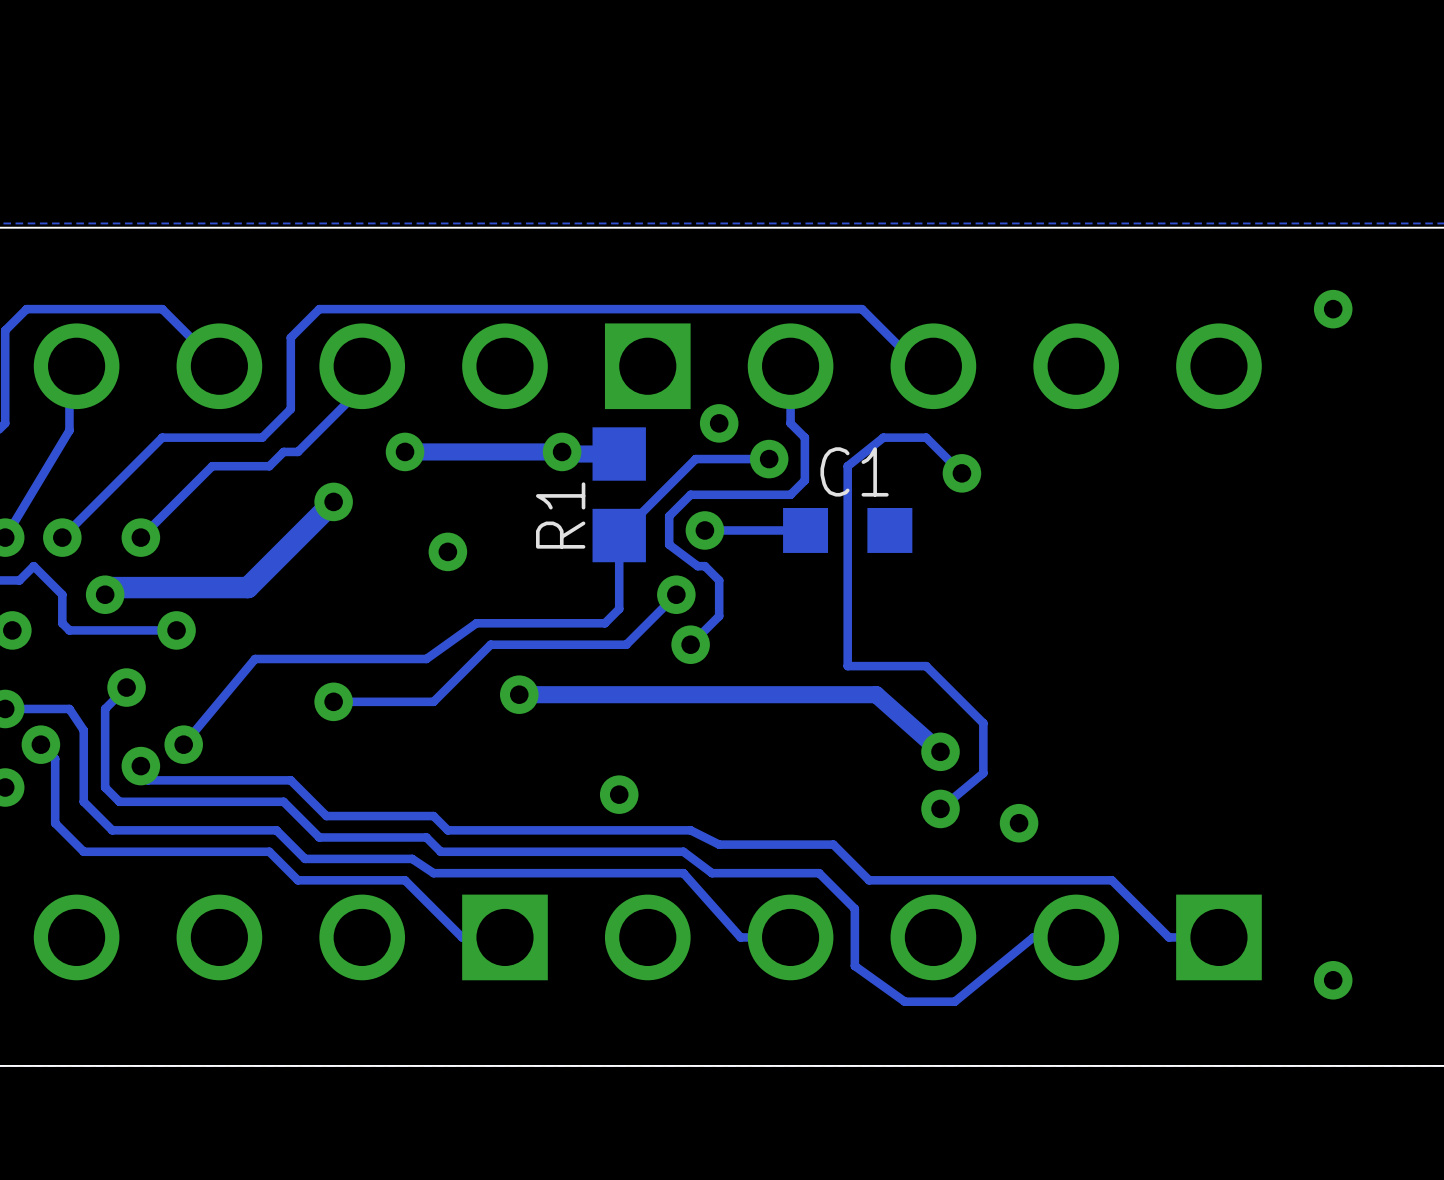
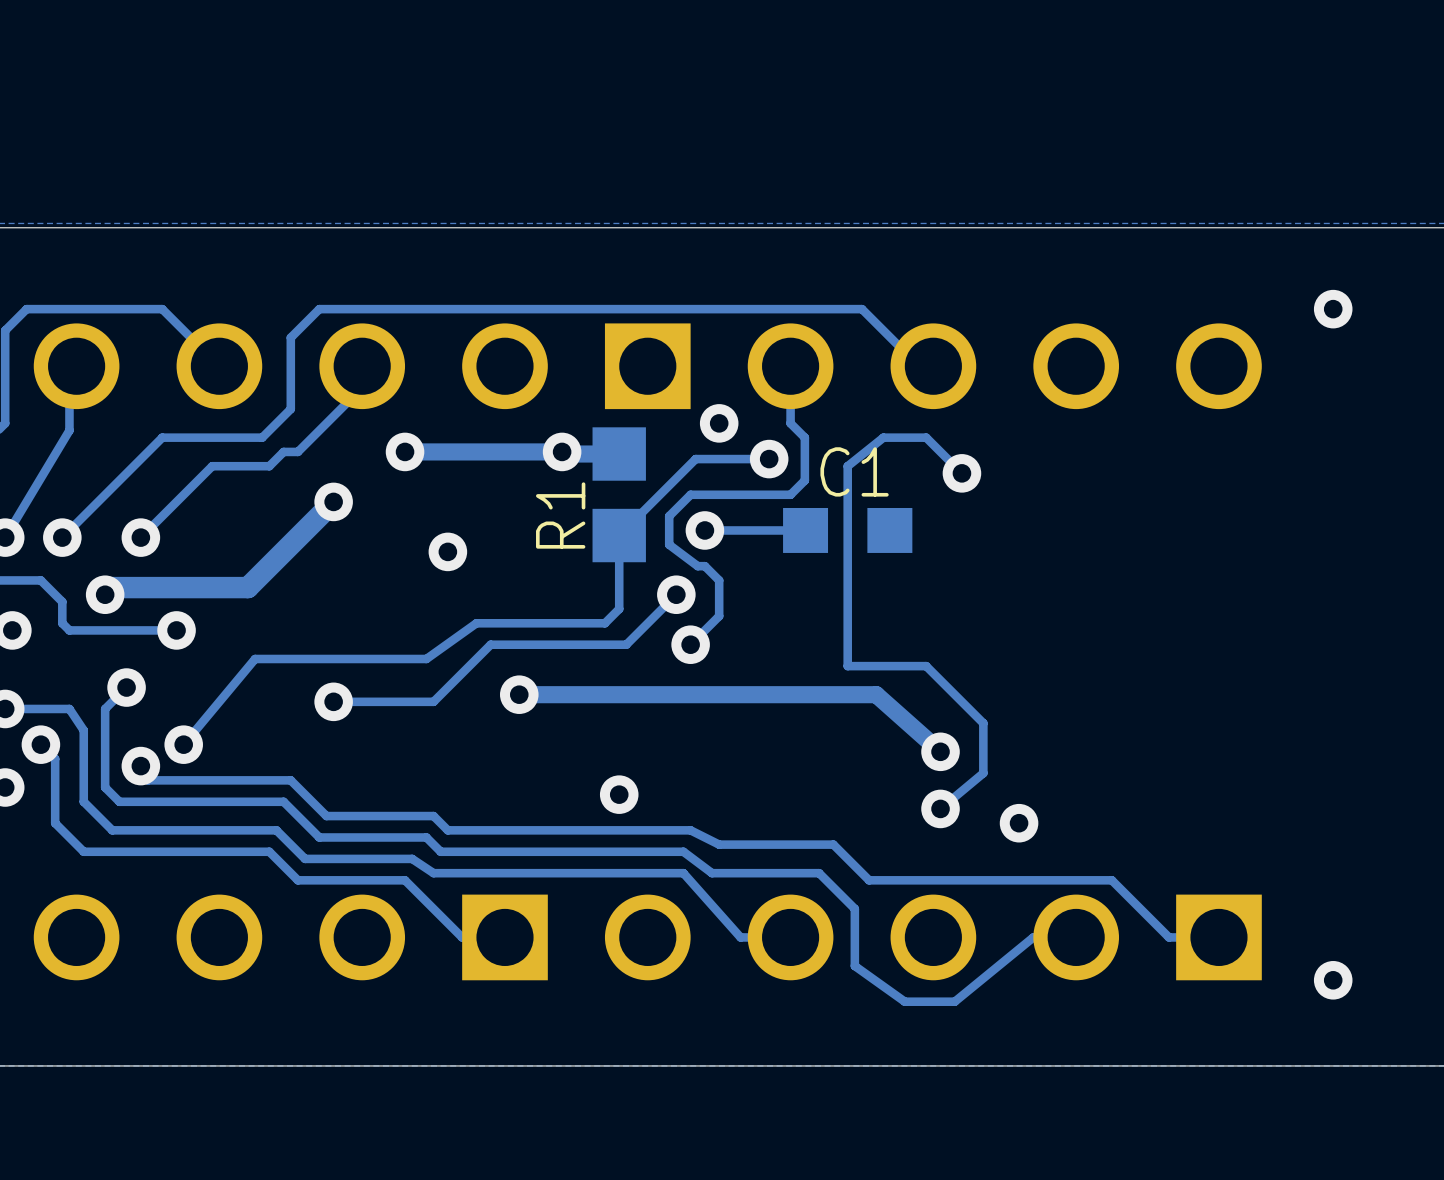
track: (19, 580) (33, 566) (62, 594) (62, 601) -> (19, 580) (40, 580) (62, 601)

